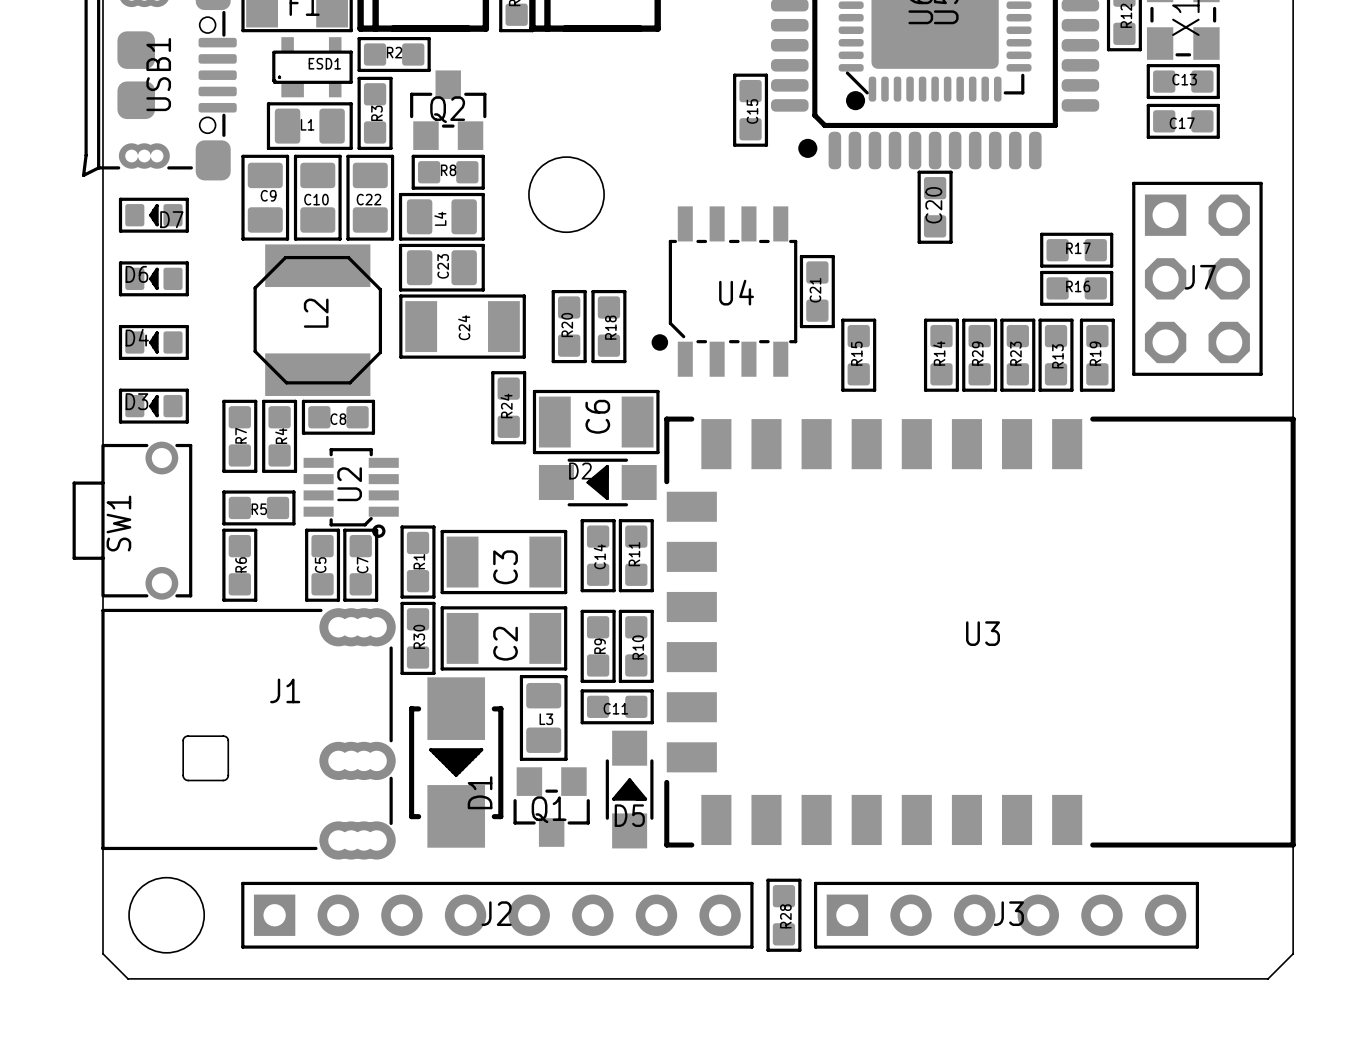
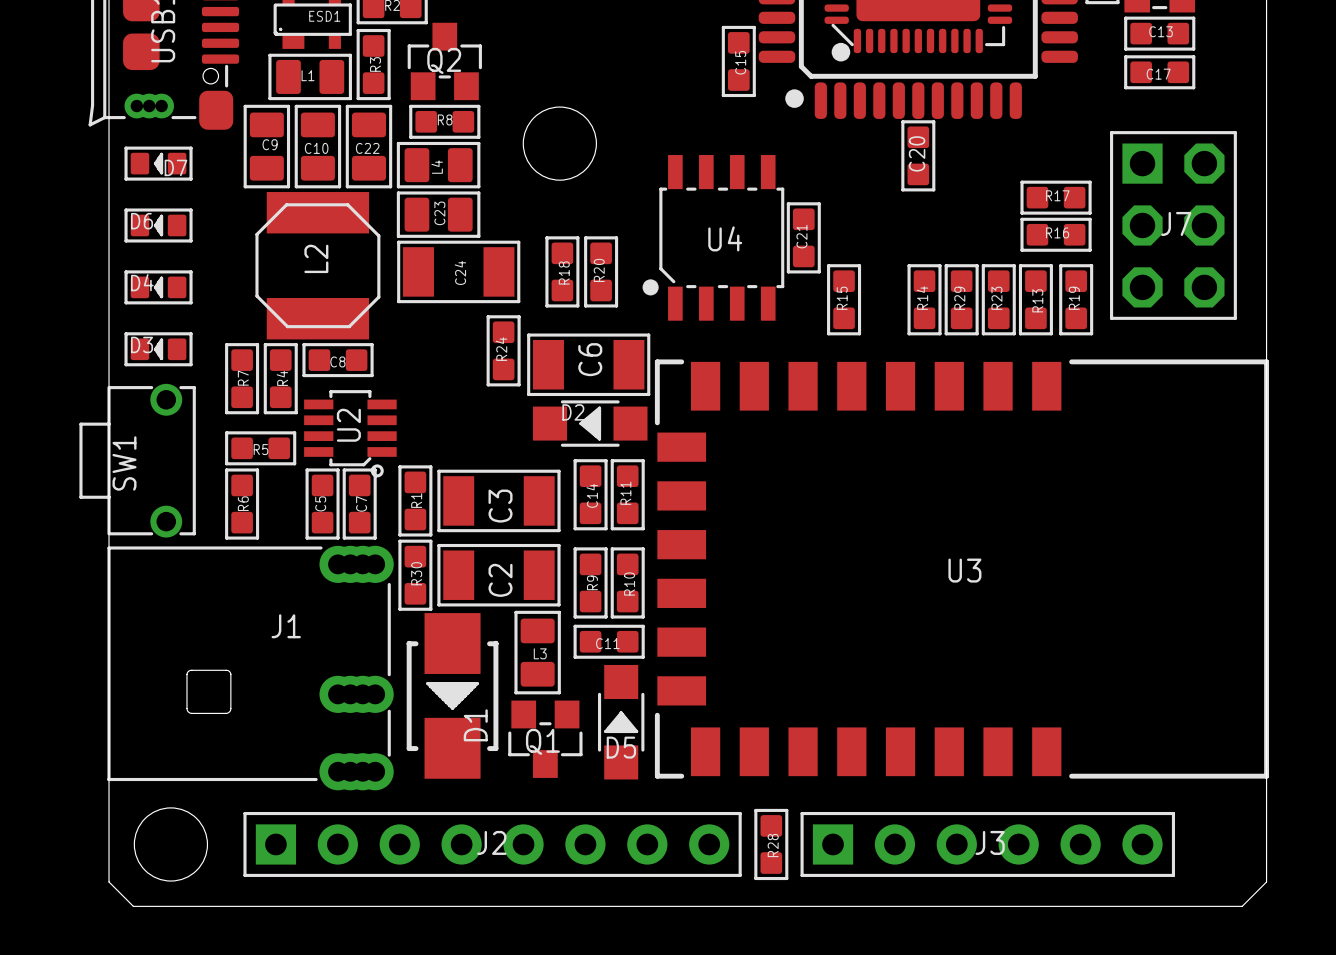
R20 name: R20 (567, 325) -> R18 (564, 272)
R18 name: R18 (610, 327) -> R20 (599, 270)

